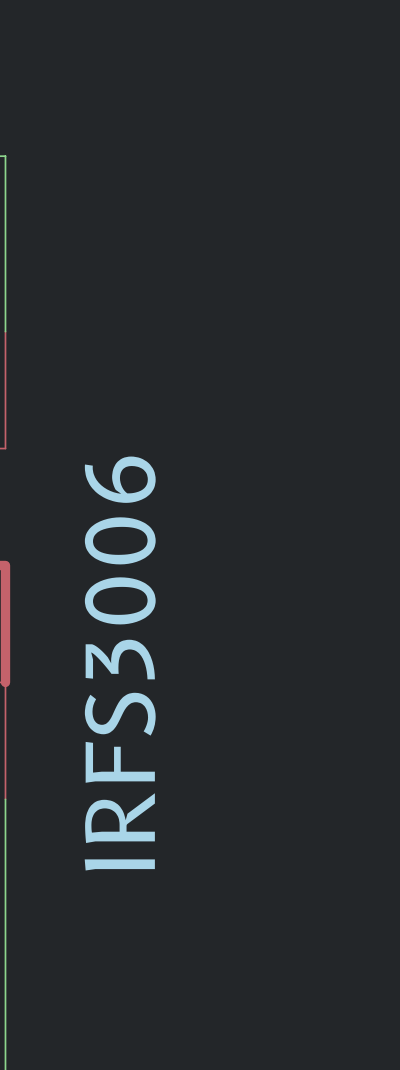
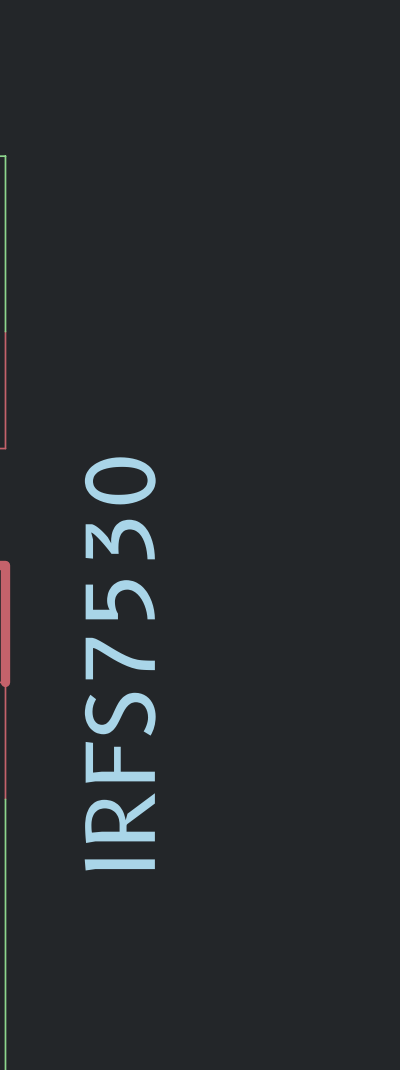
part value: IRFS3006 (120, 663) -> IRFS7530 (120, 663)

